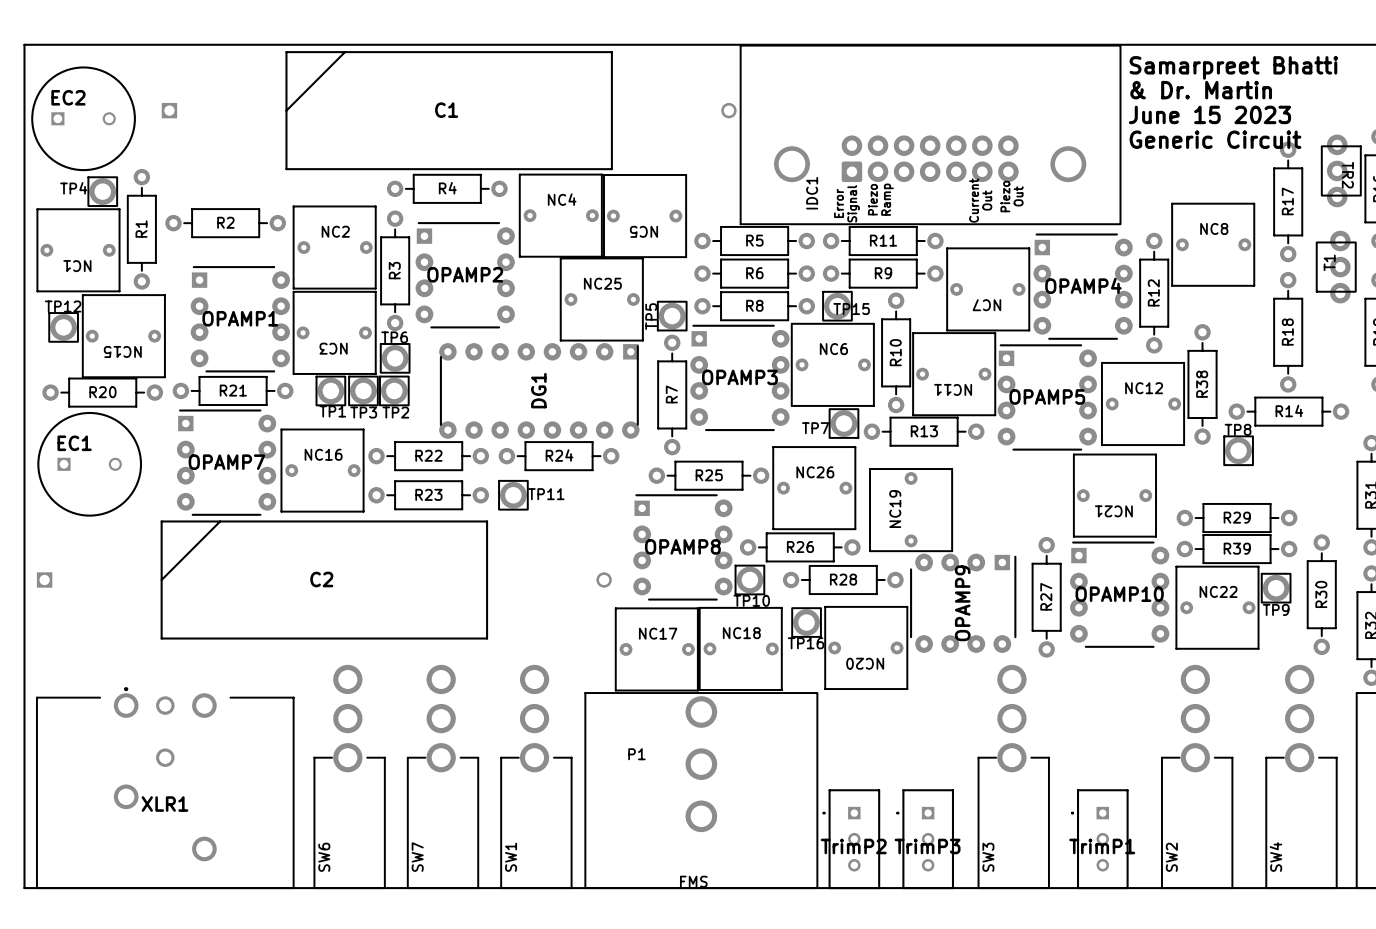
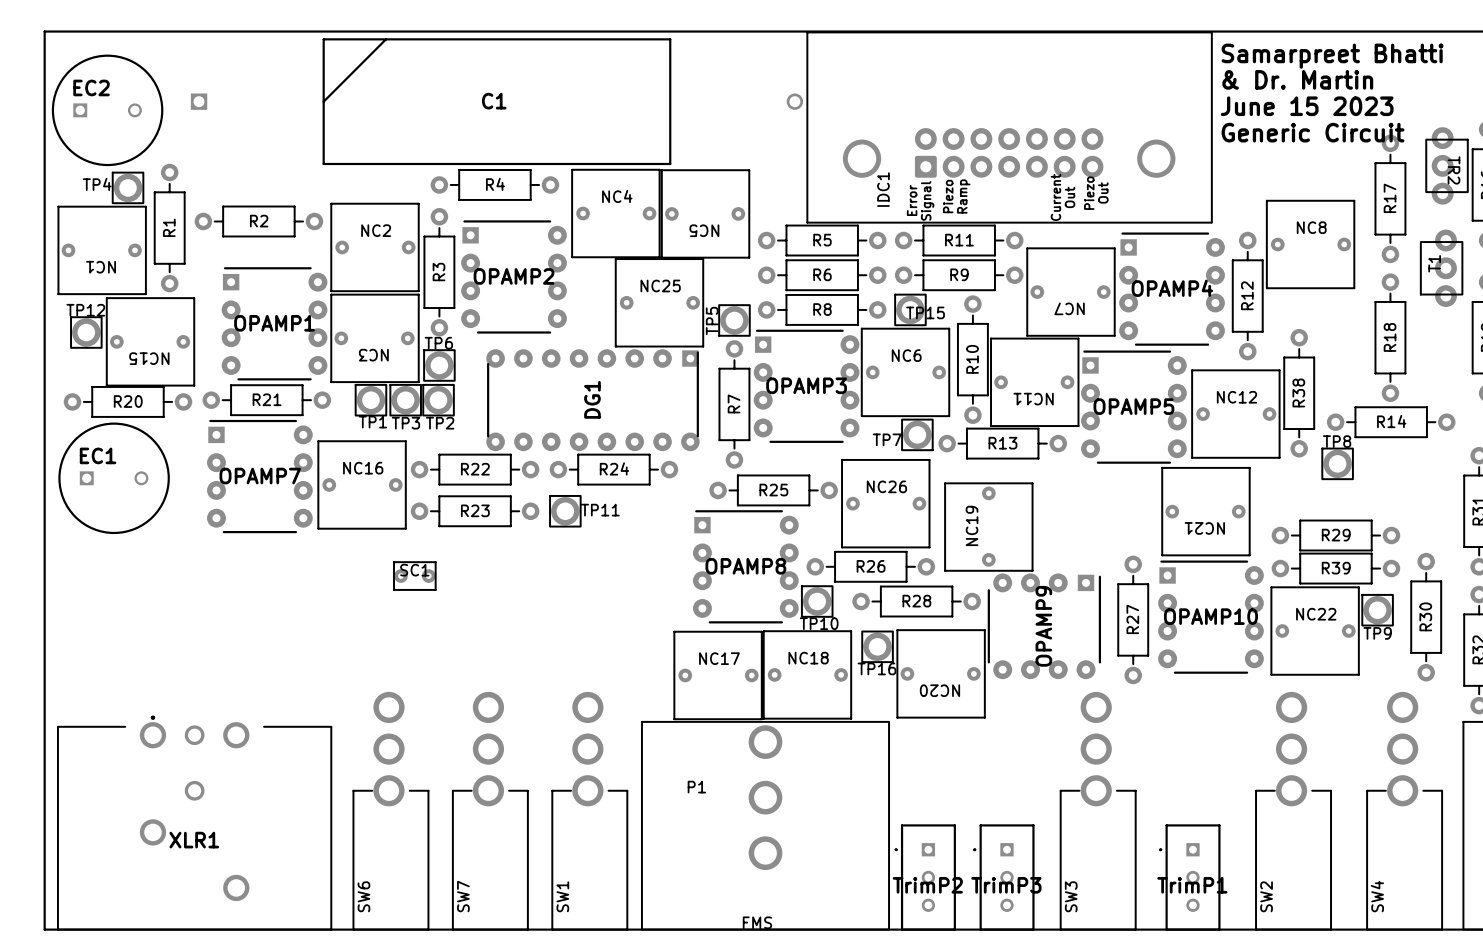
SC1: none -> (414, 576)
C2: (324, 580) -> none

